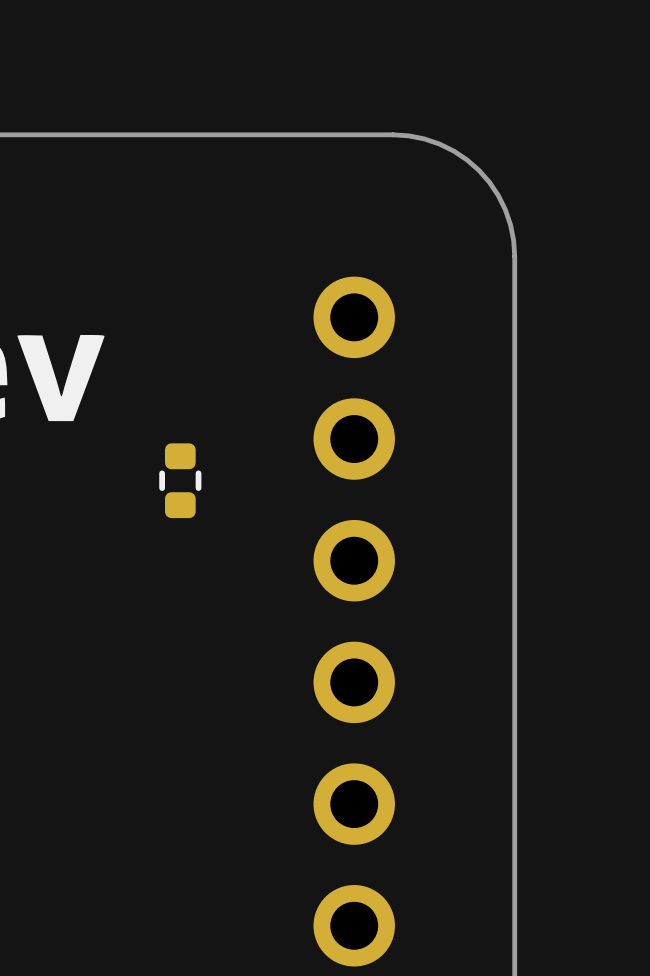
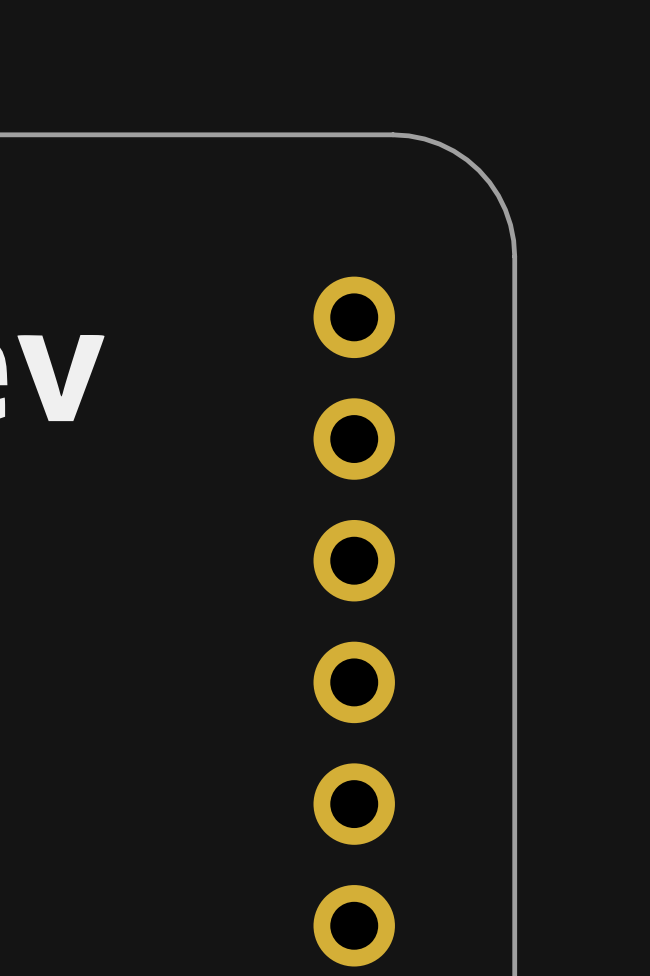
part: (180, 480) -> none

